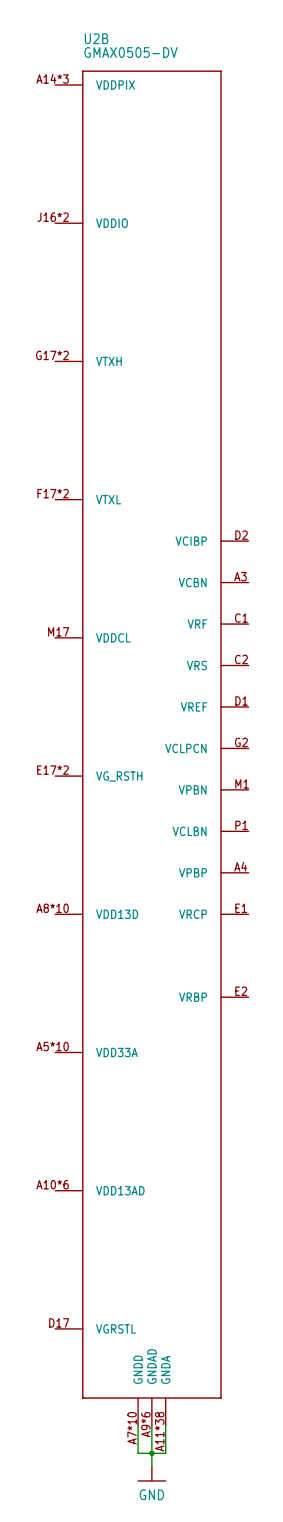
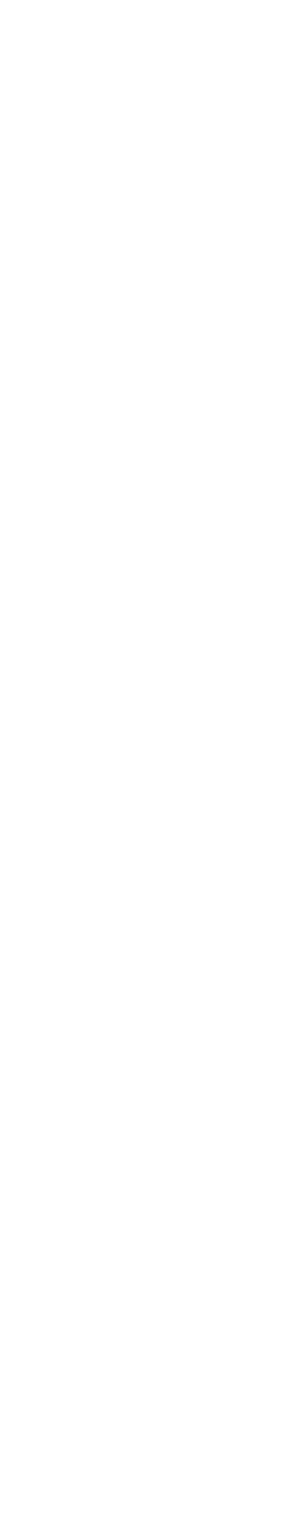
U2B: GMAX0505-DV (151, 748) -> none
wire: (138, 1425) (138, 1453) (165, 1453) (165, 1425) -> none
wire: (151, 1425) (151, 1467) -> none
junction: (151, 1453) -> none
power symbol: GND (151, 1474) -> none

